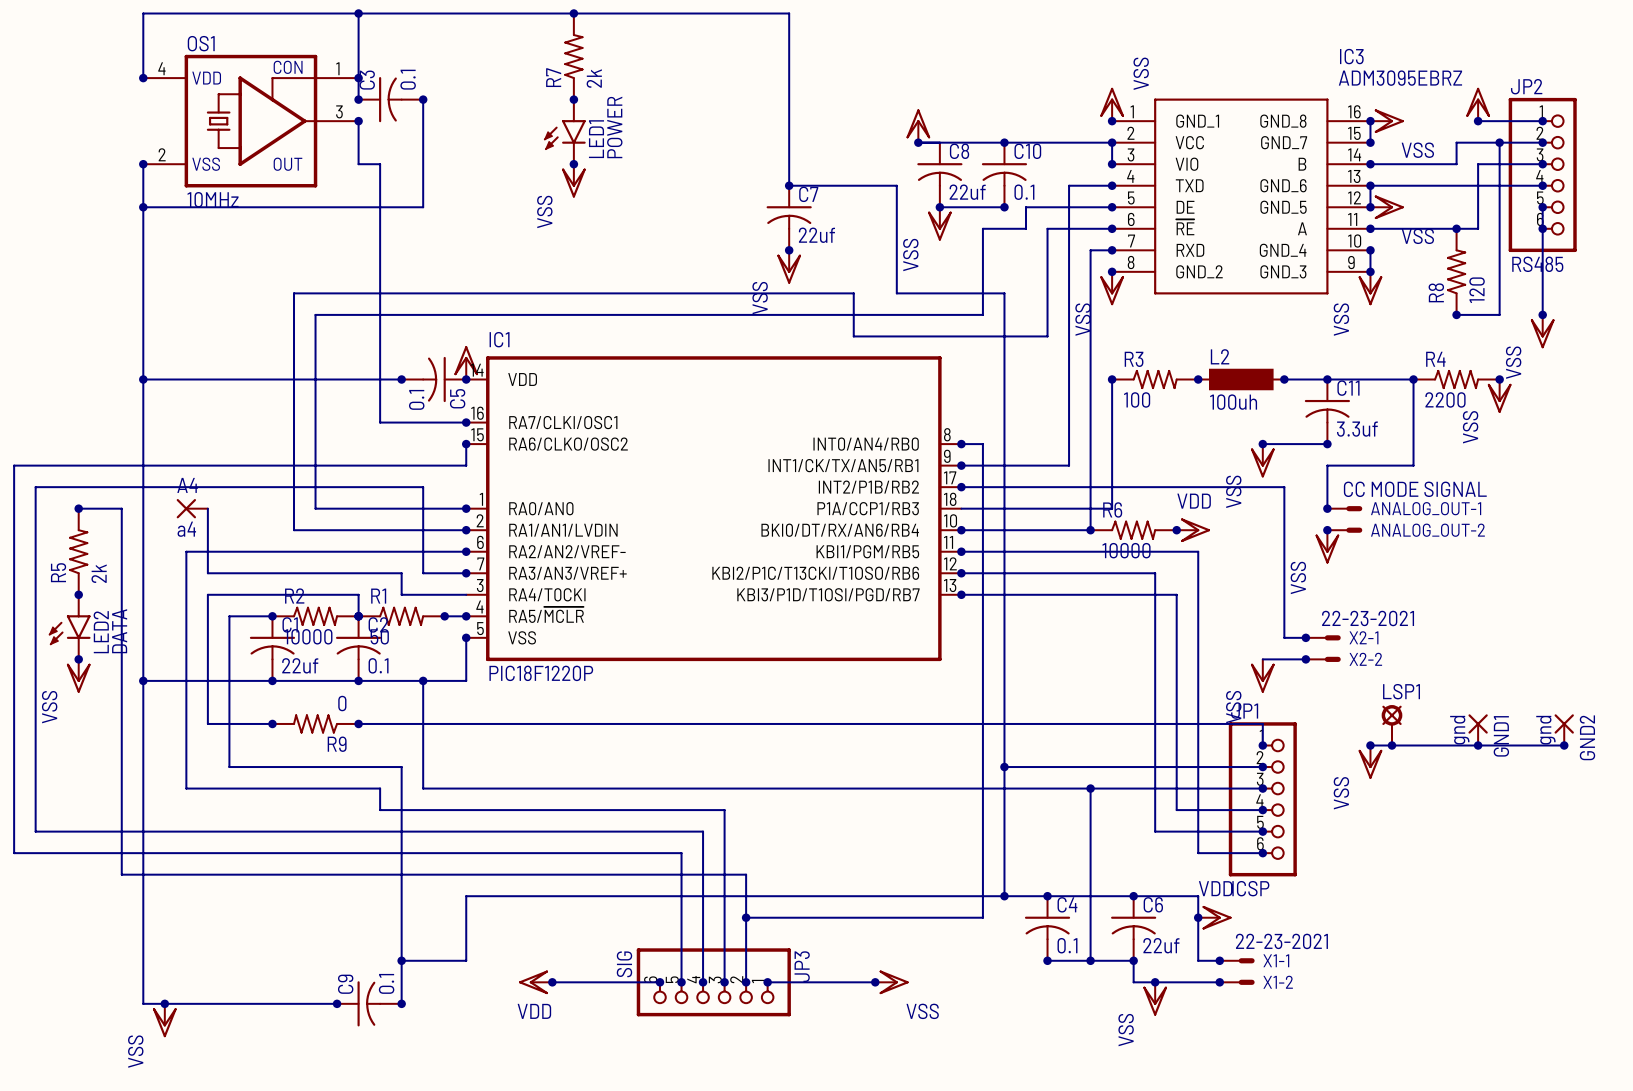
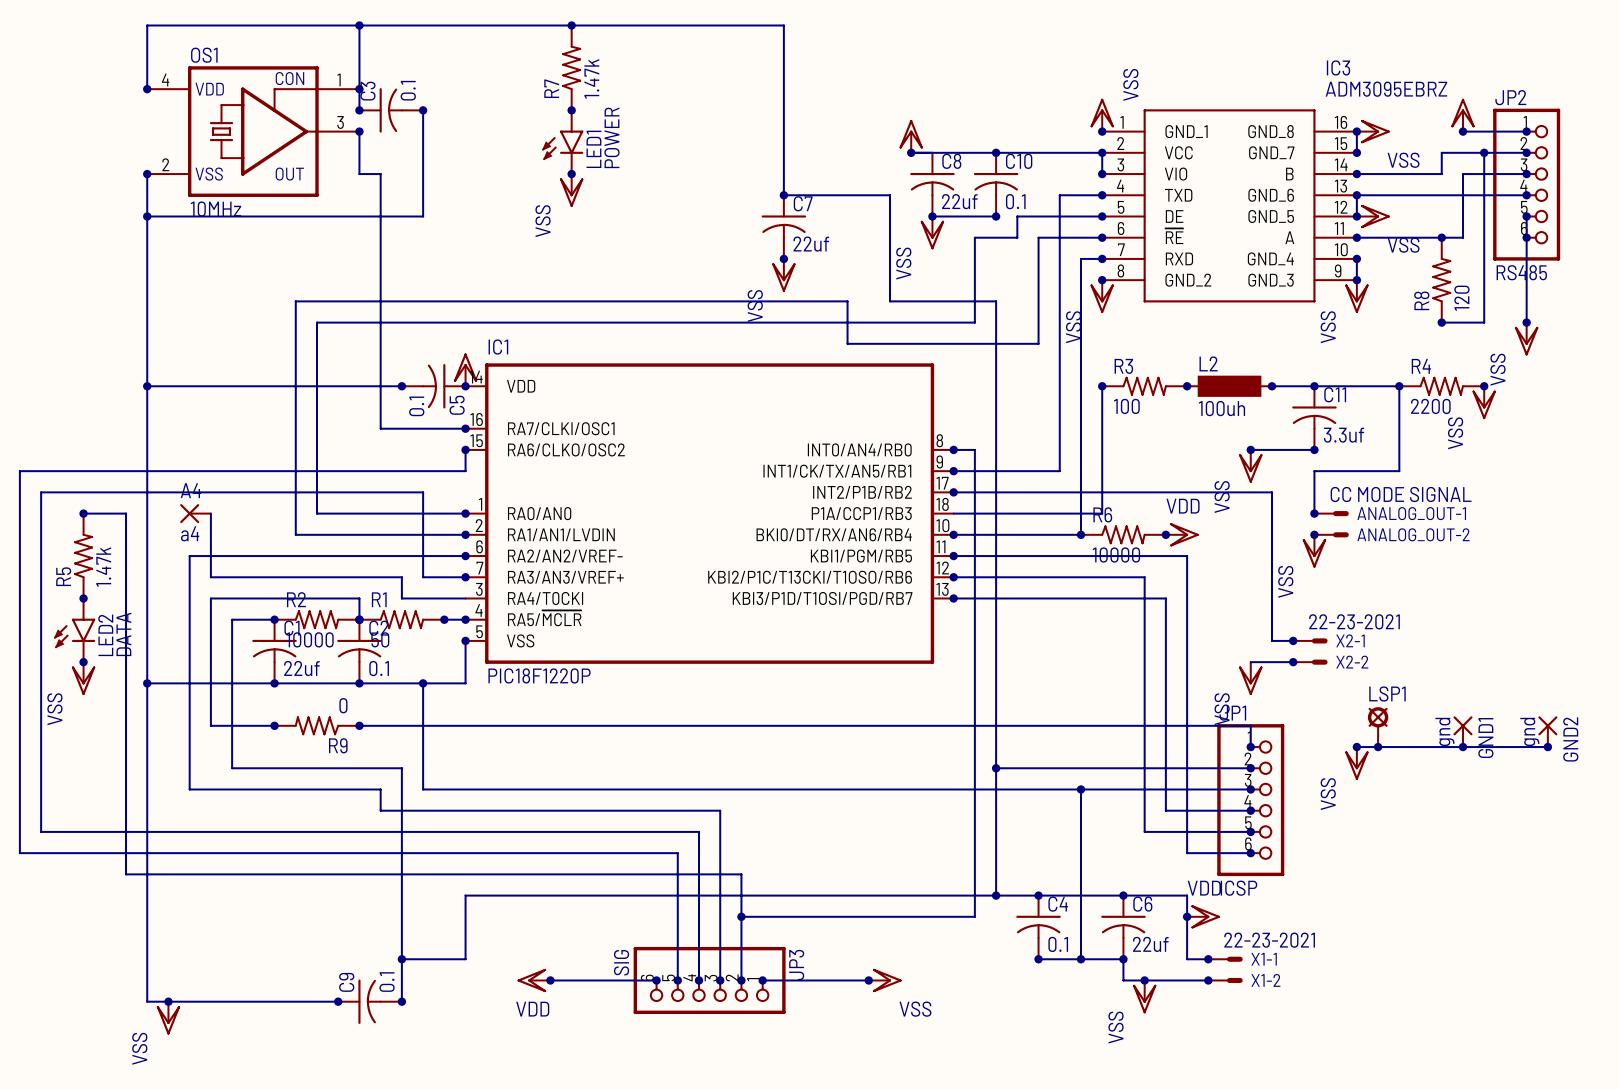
R7 value: 2k (594, 78) -> 1.47k (591, 78)
R5 value: 2k (99, 573) -> 1.47k (103, 567)

